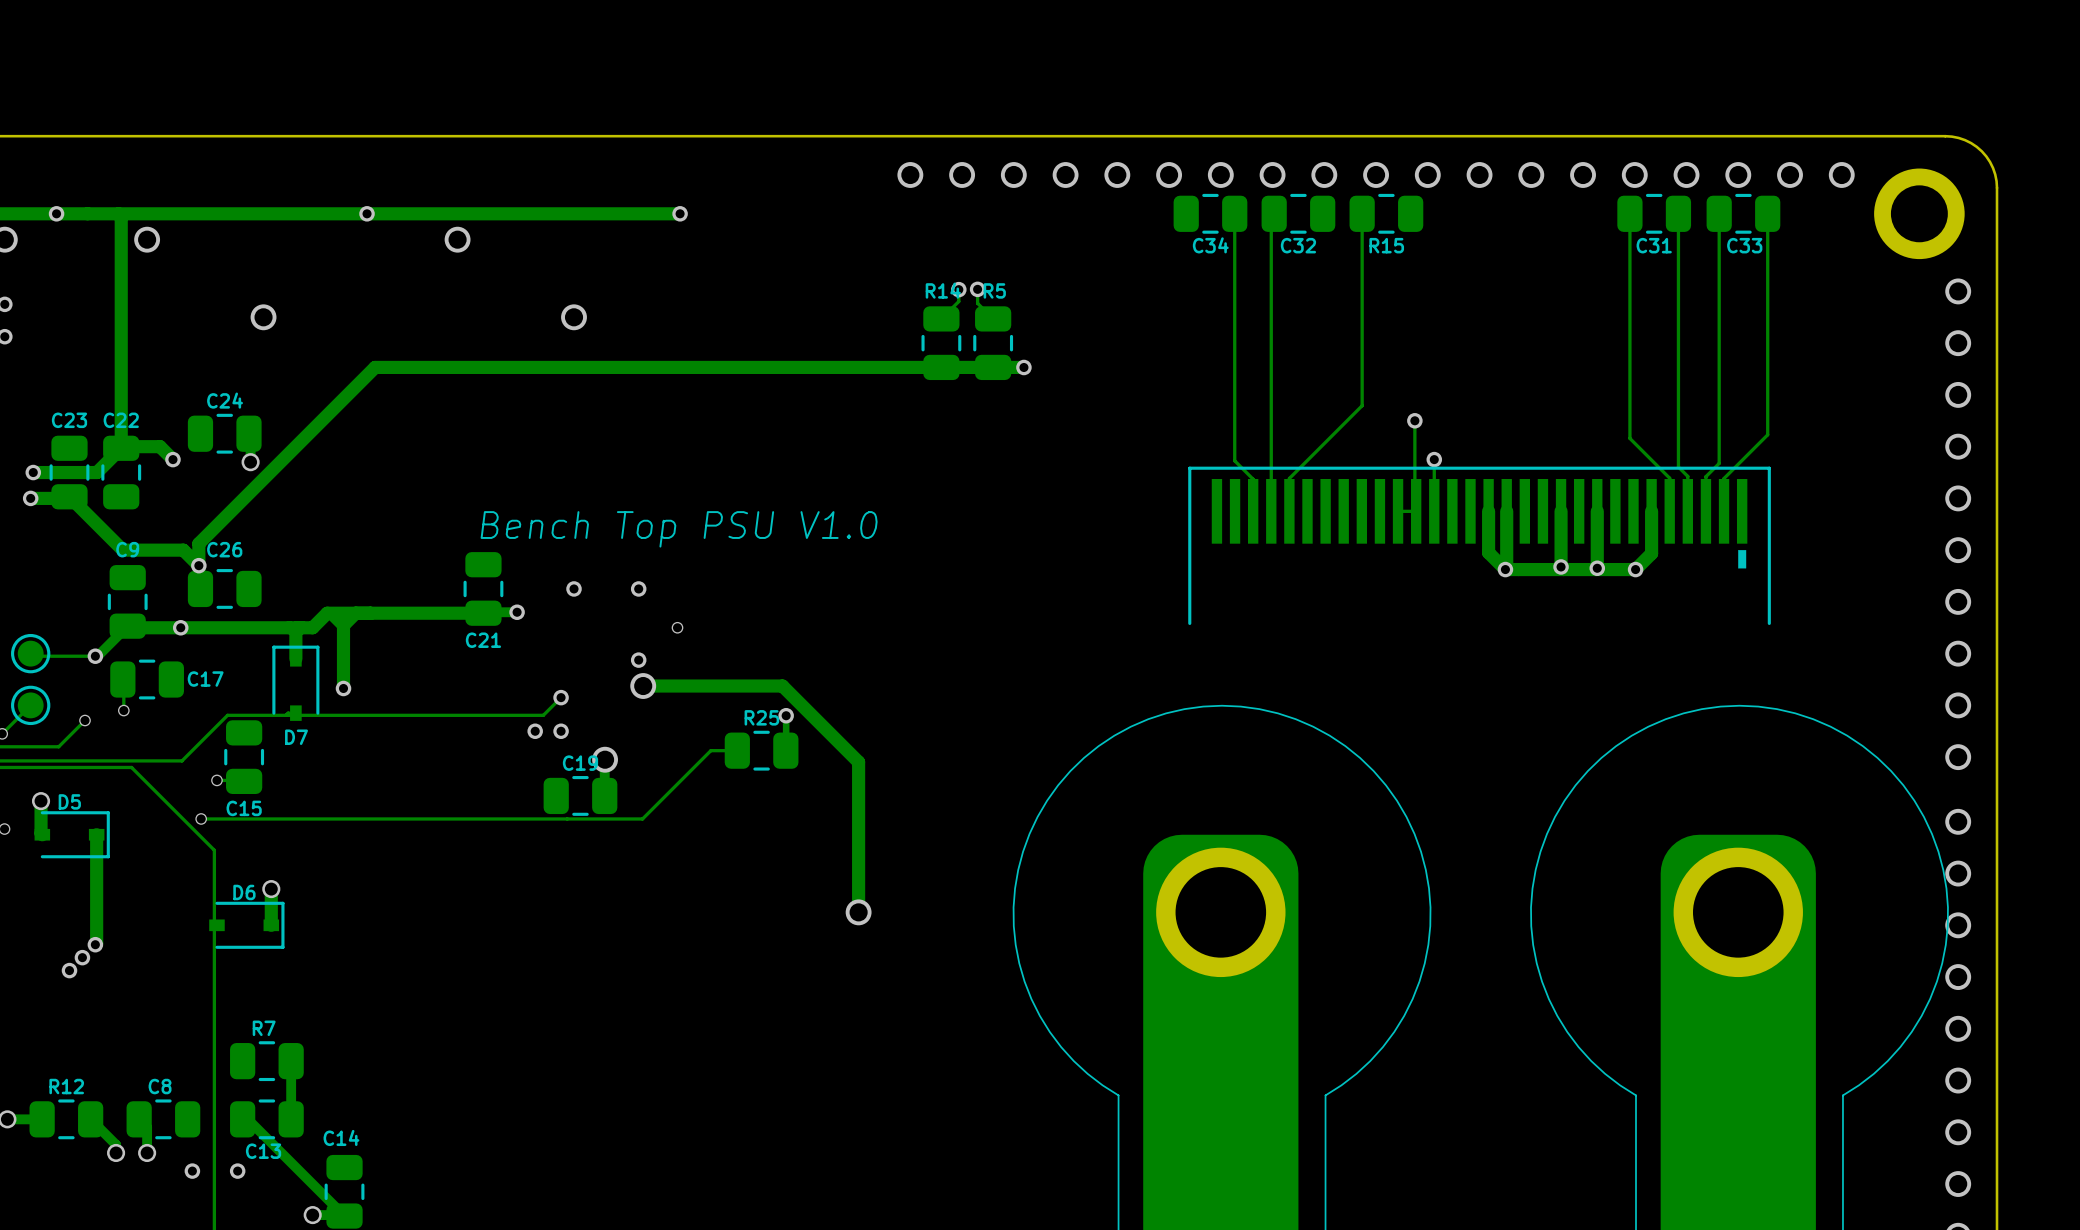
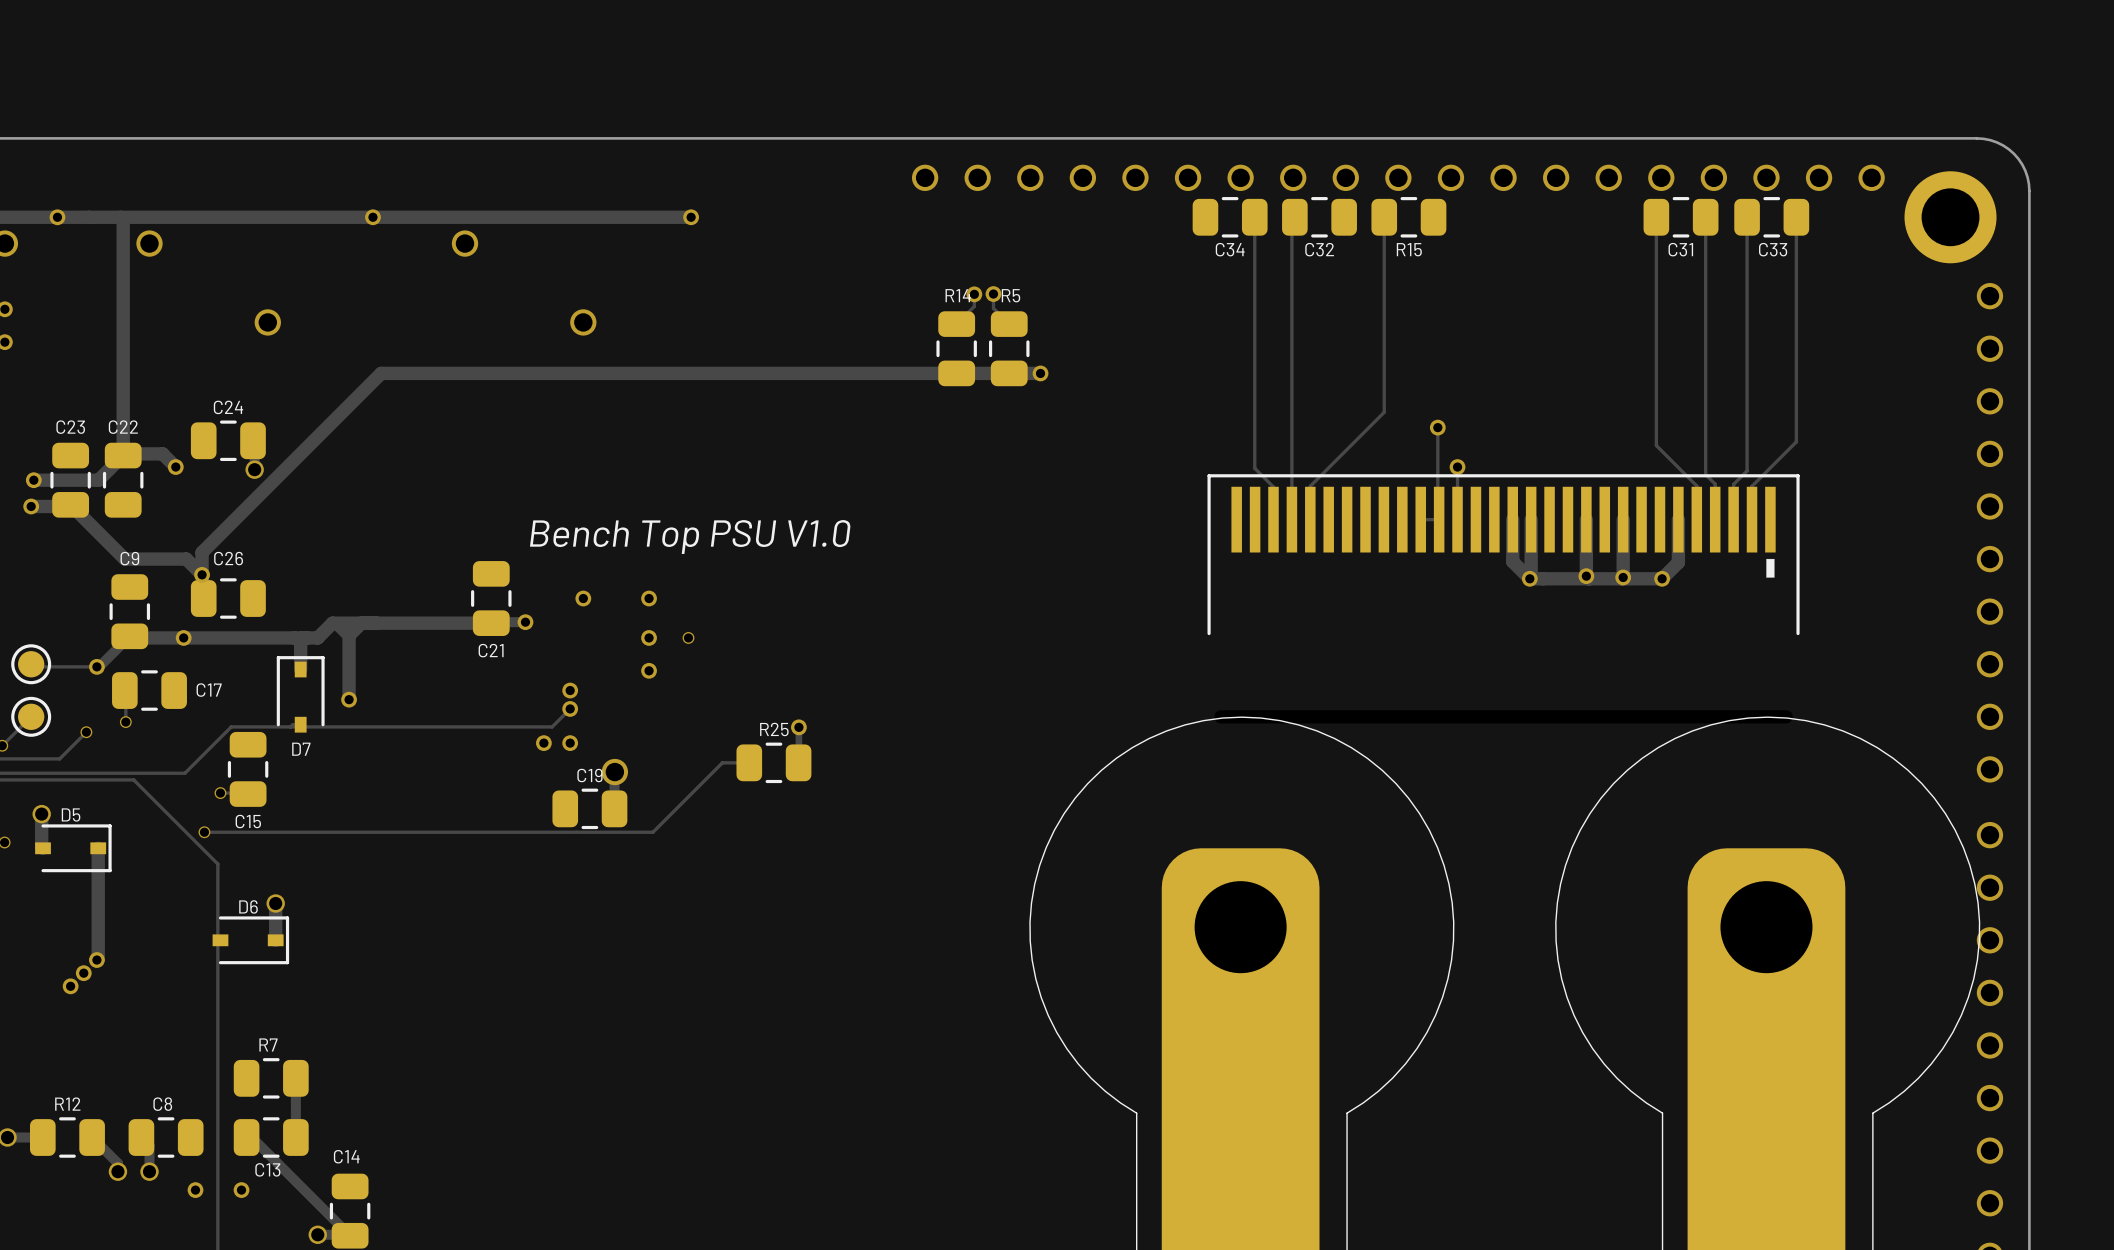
via: none -> (649, 637)
via: none -> (570, 690)
track: (643, 686) (782, 686) (858, 762) (858, 912) -> none
via: (643, 686) -> none
via: (858, 912) -> none

